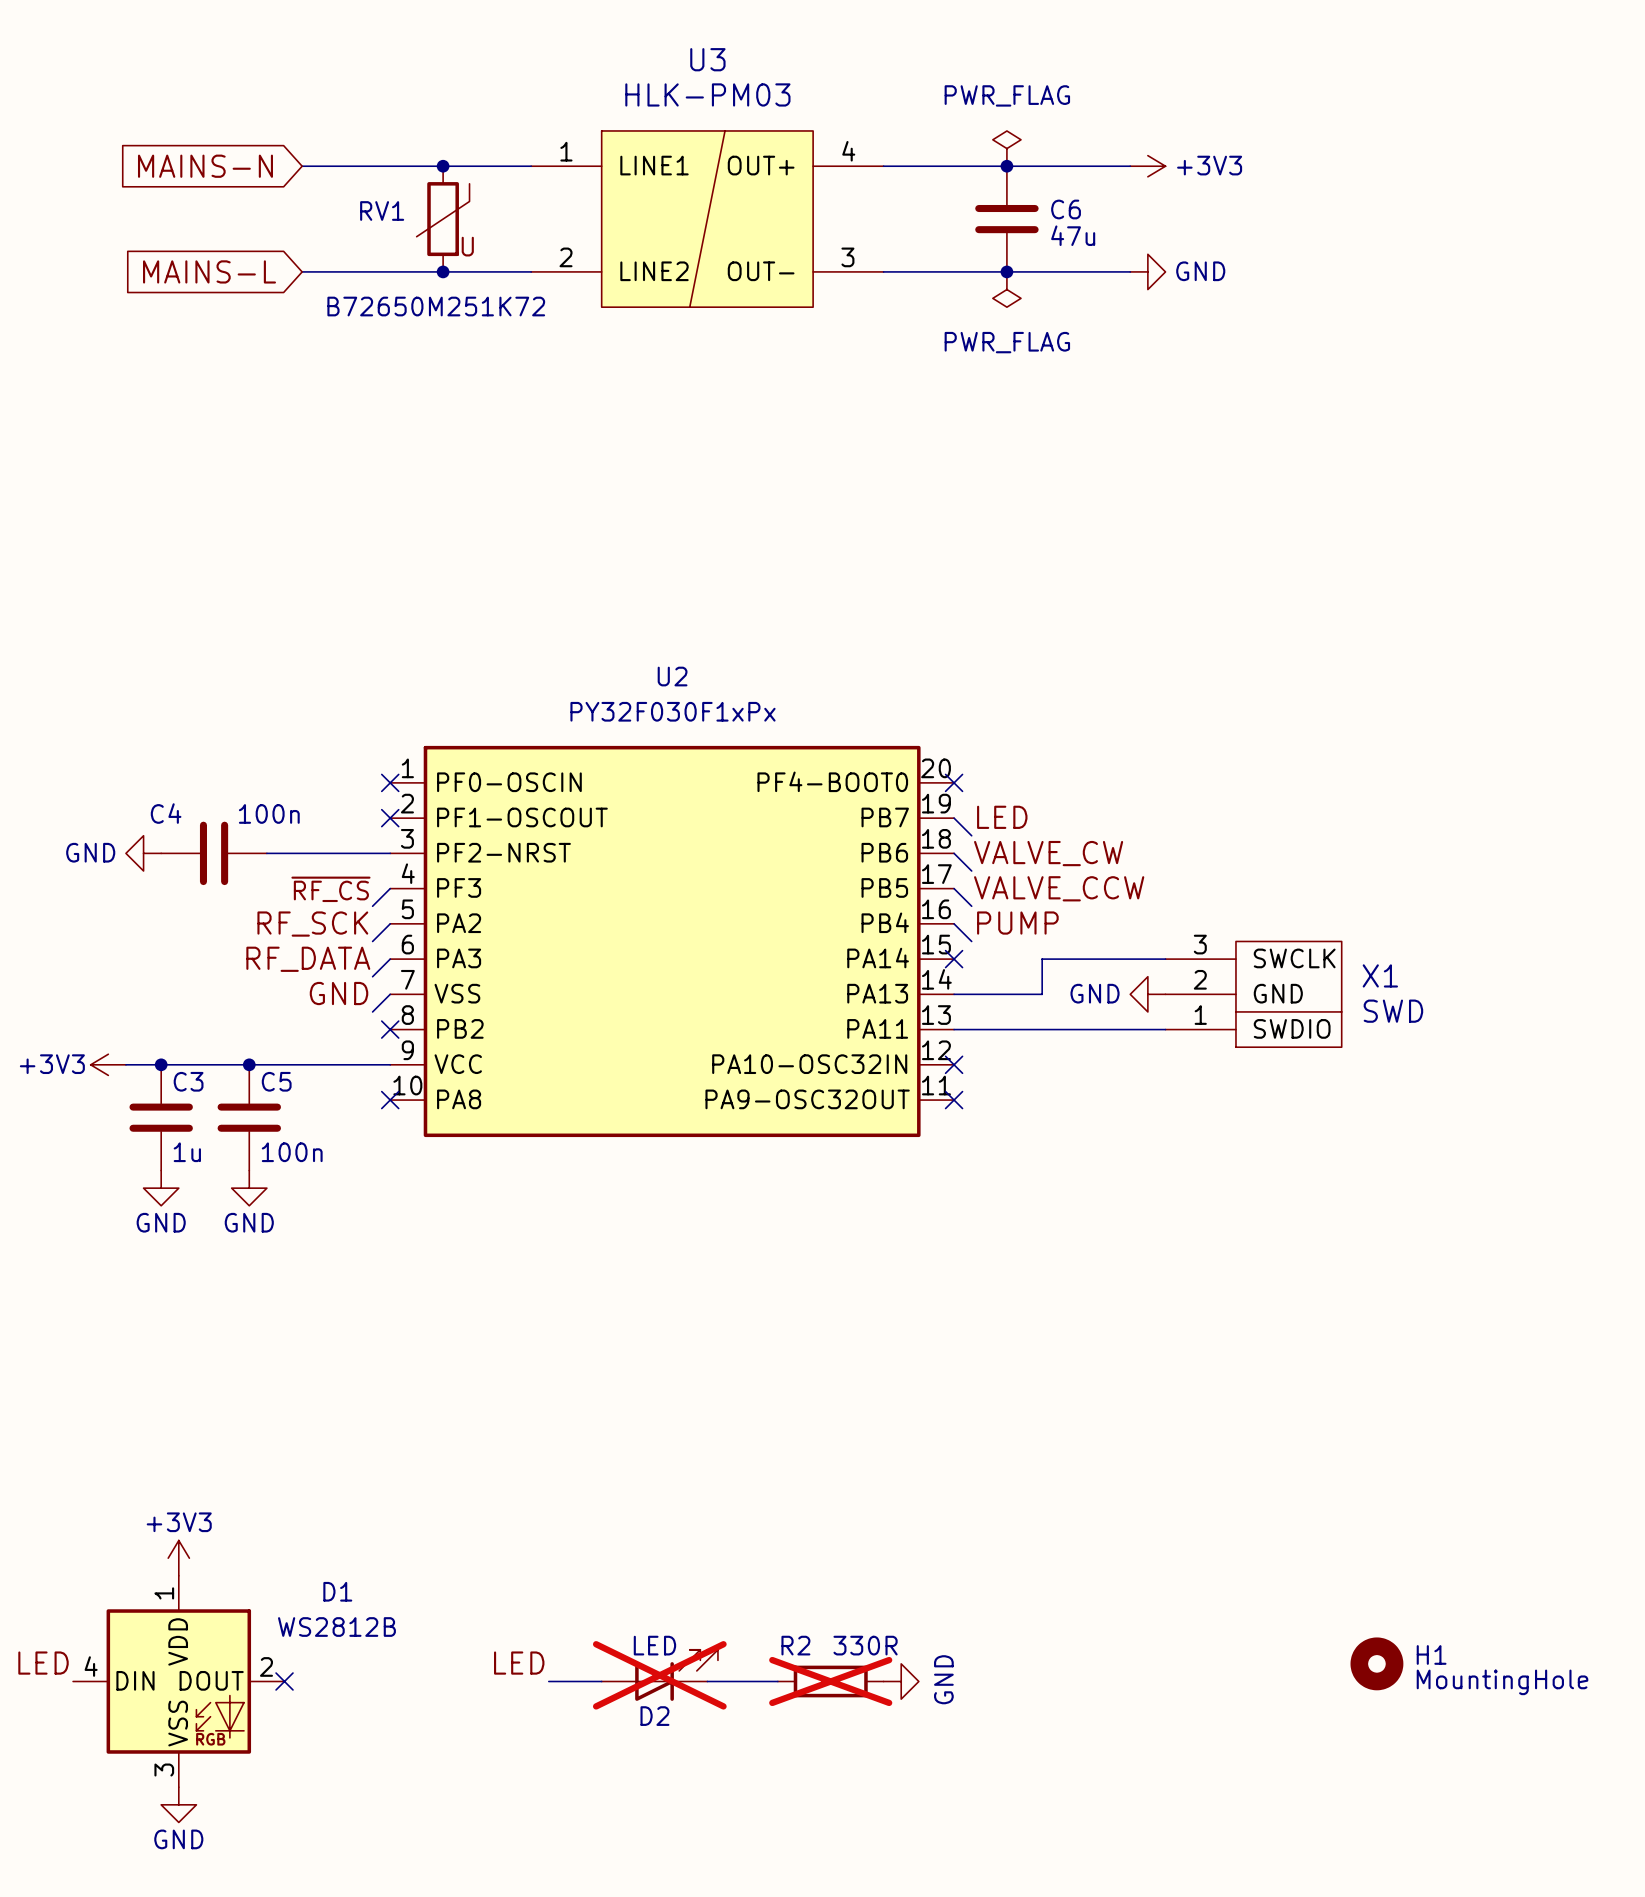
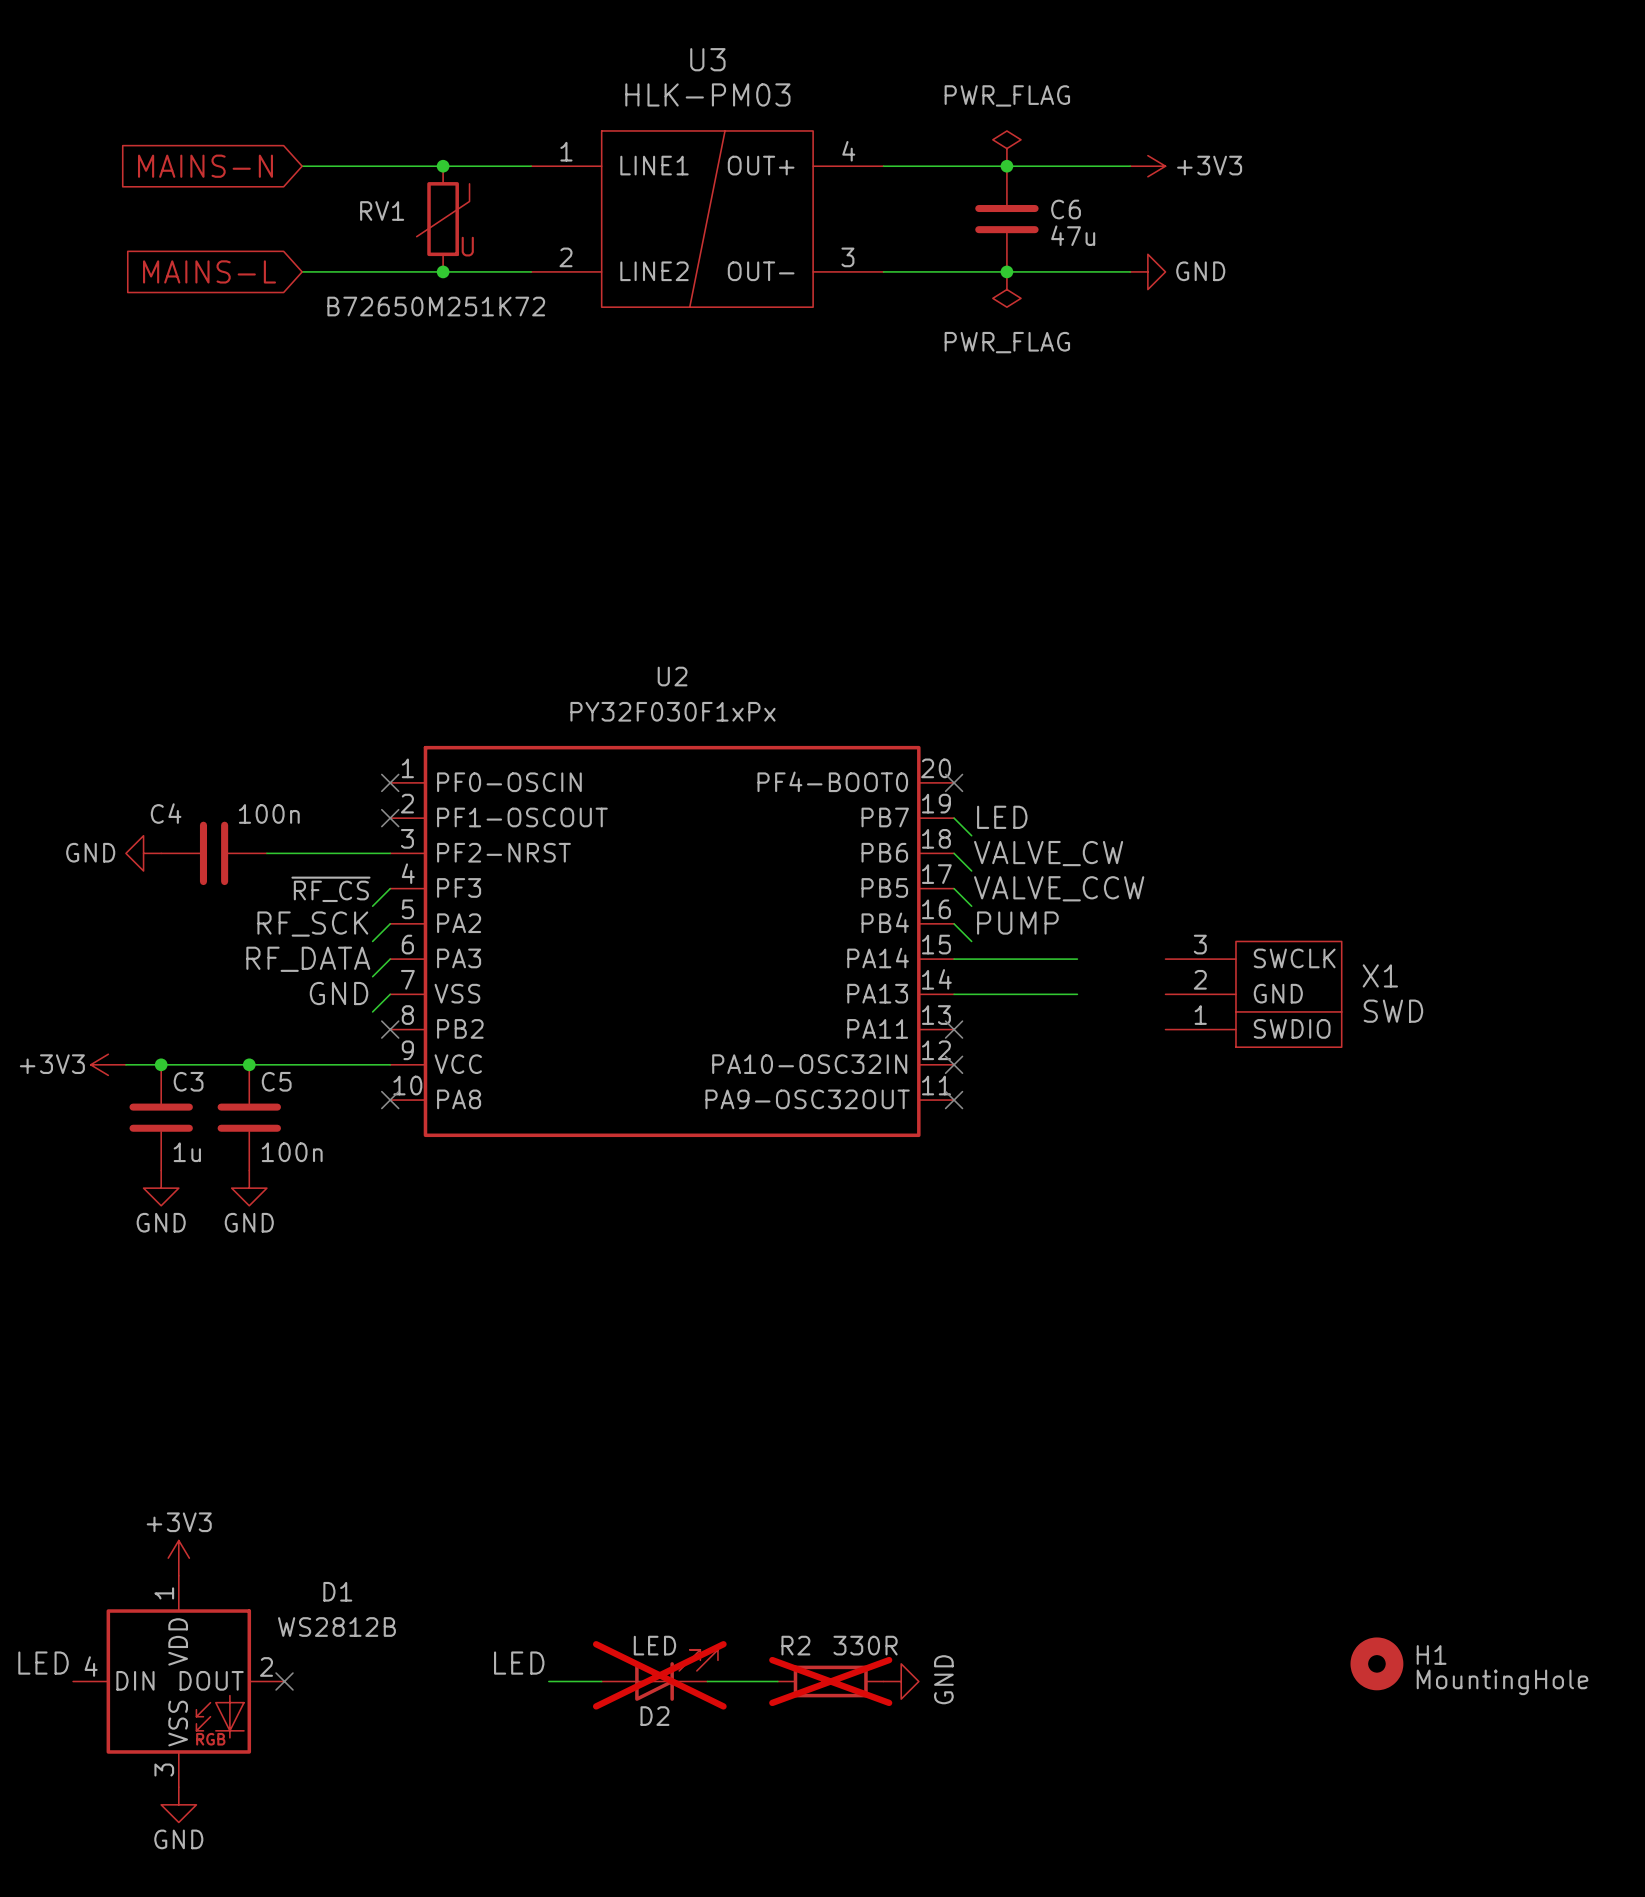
no-connect mark position: (954, 959) -> (954, 1029)
wire: (1042, 959) (1042, 994) -> (1077, 994) (1042, 994)
wire: (1077, 959) (1165, 959) -> (954, 959) (1042, 959)
power symbol: GND (1147, 994) -> none
wire: (954, 1029) (1165, 1029) -> none

